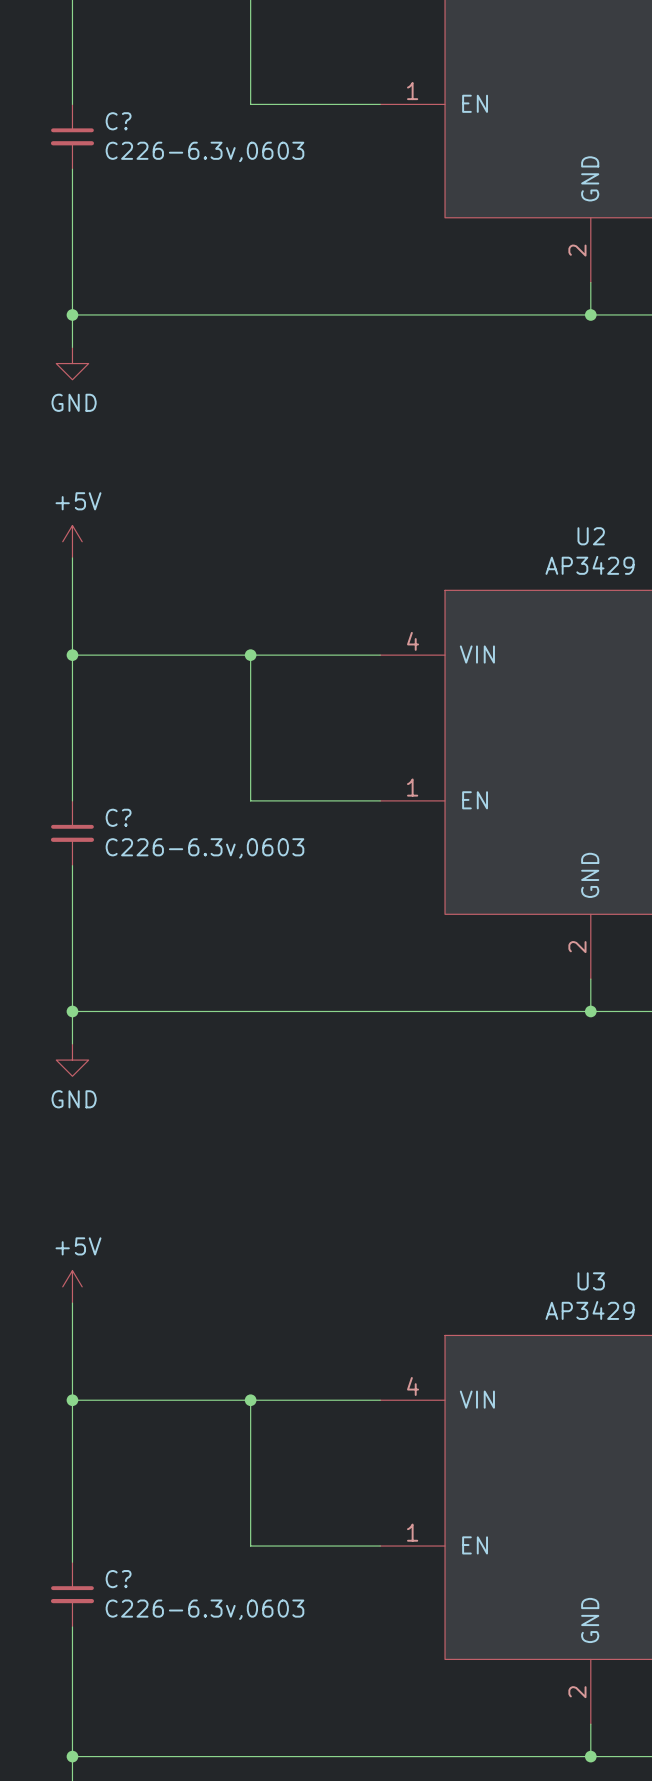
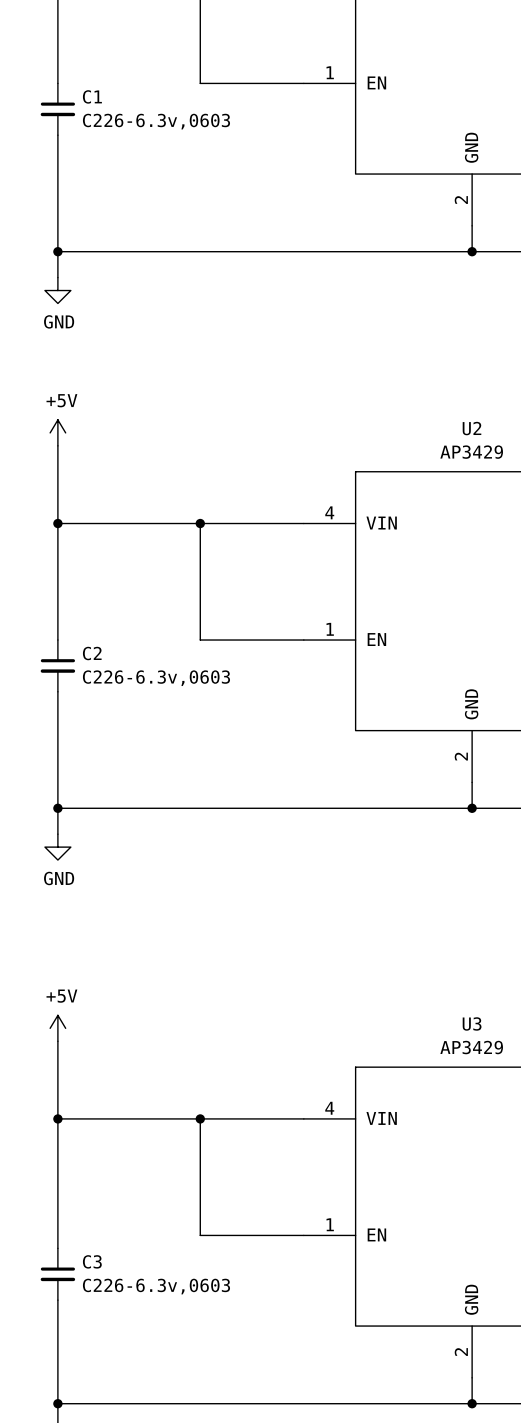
C? name: C? (118, 121) -> C1 (92, 96)
C? name: C? (118, 817) -> C2 (92, 653)
C? name: C? (118, 1579) -> C3 (92, 1261)

